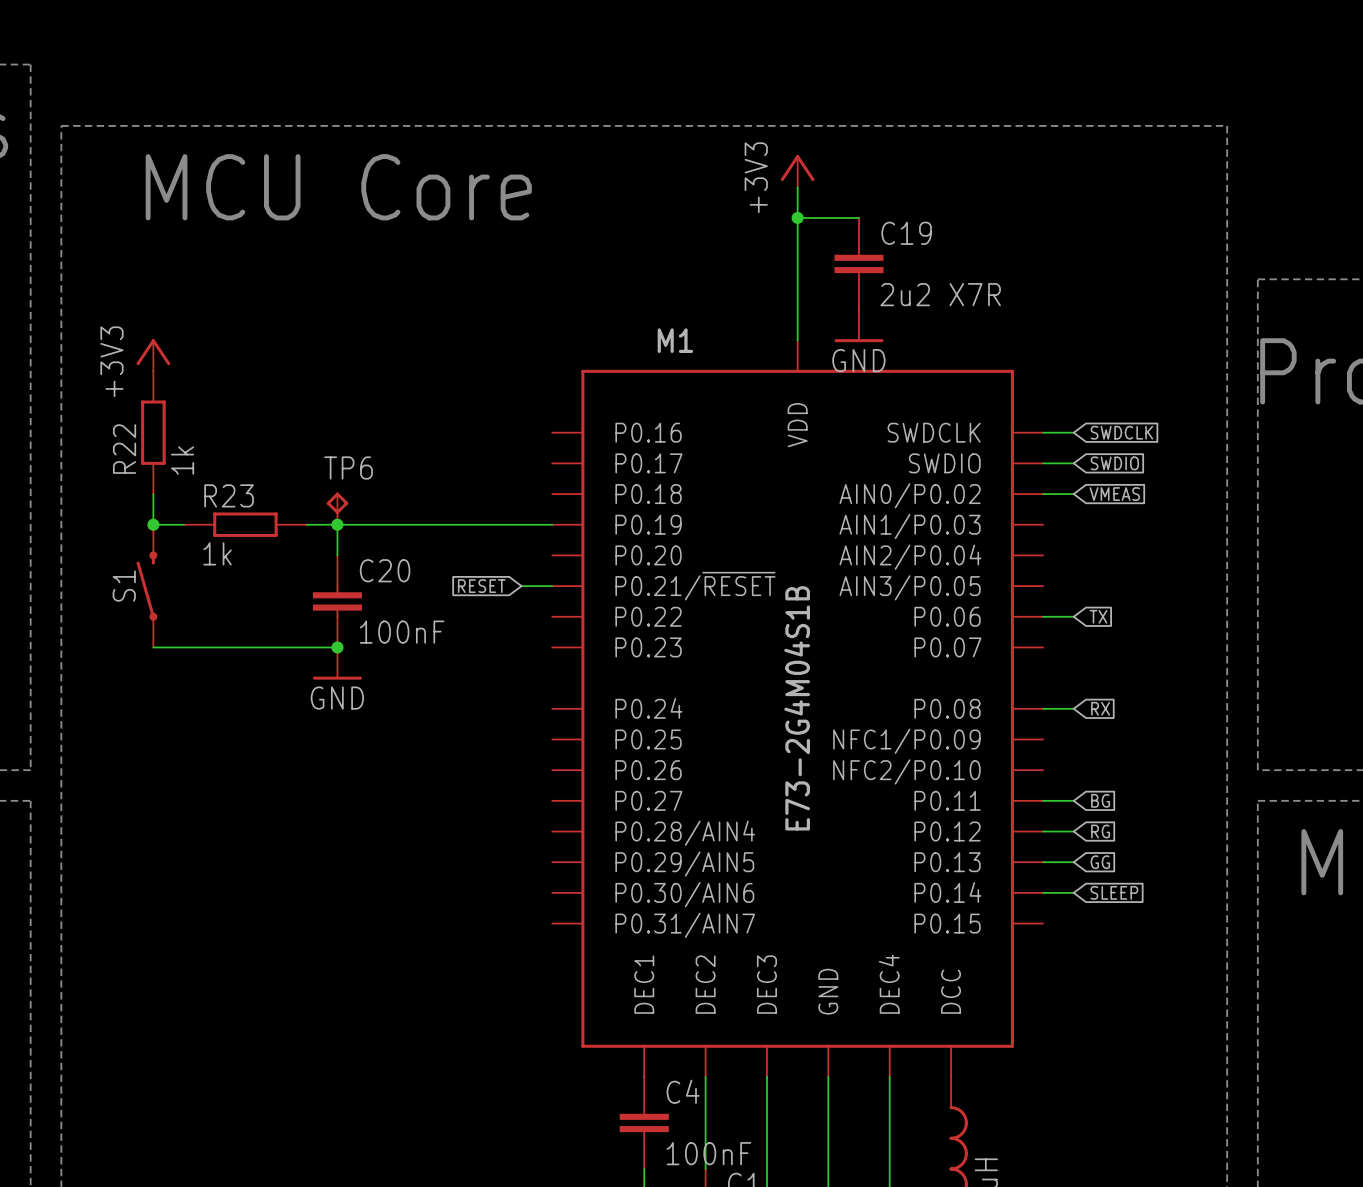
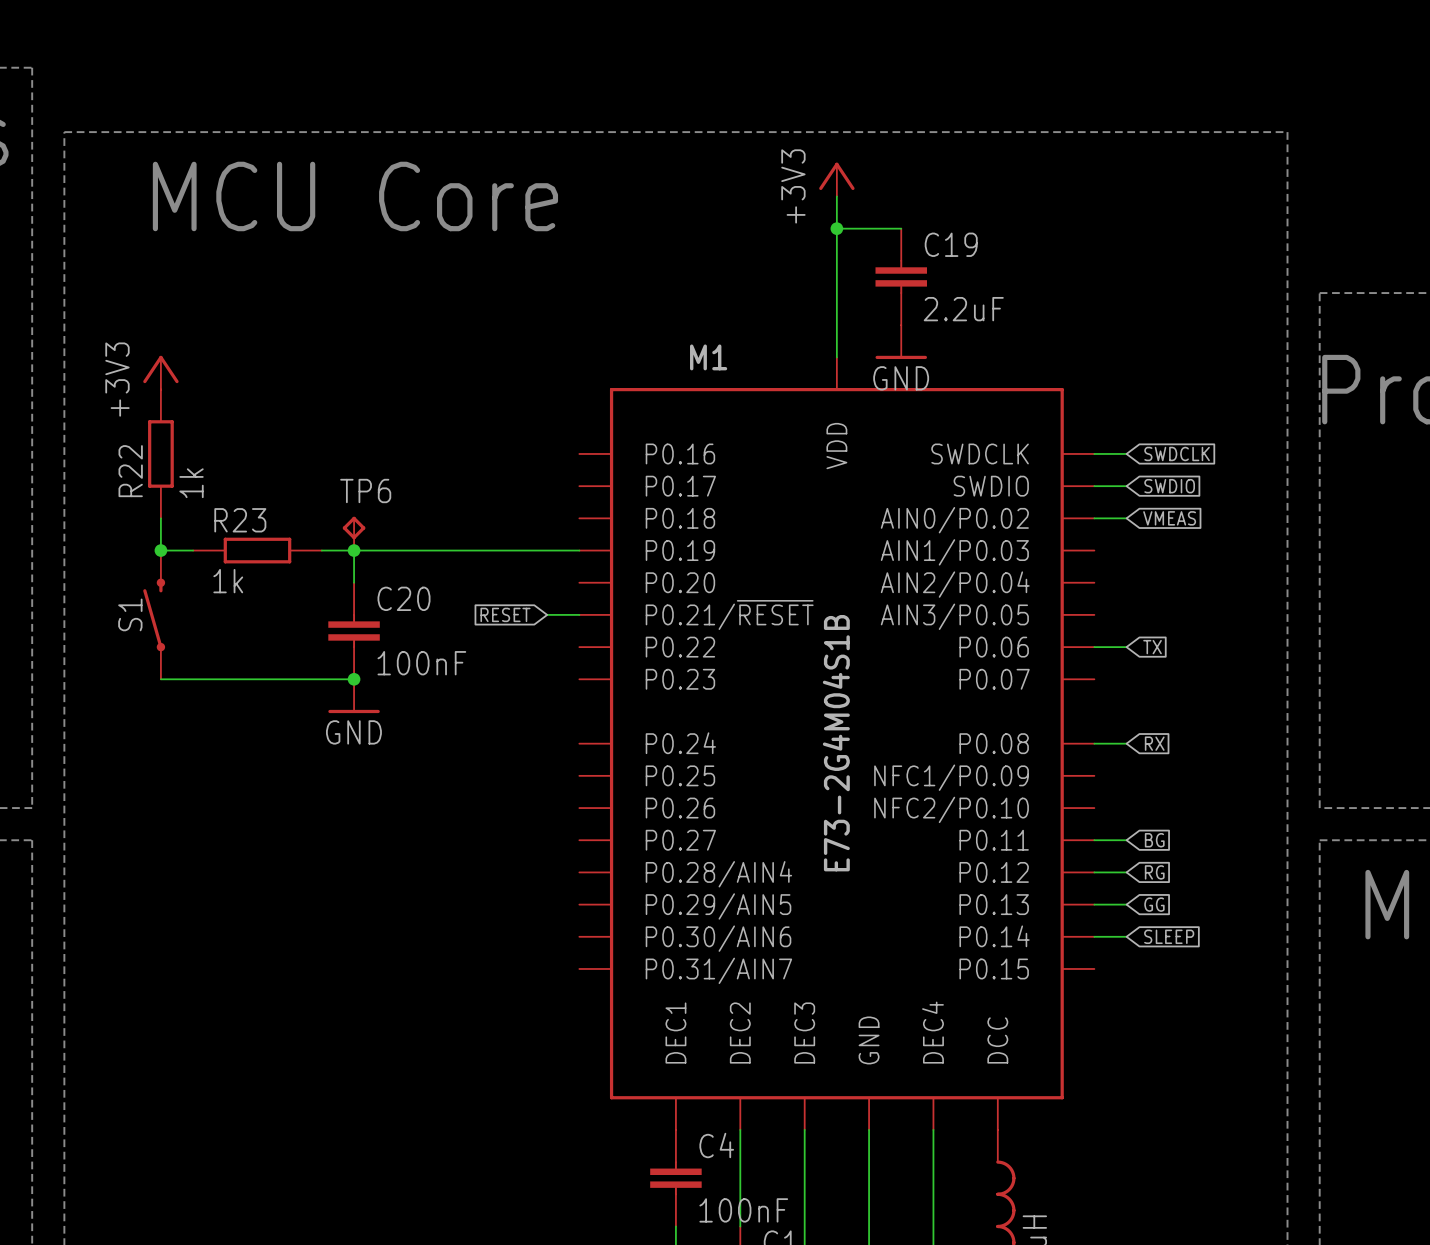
C19 value: 2u2 X7R (940, 294) -> 2.2uF (963, 309)

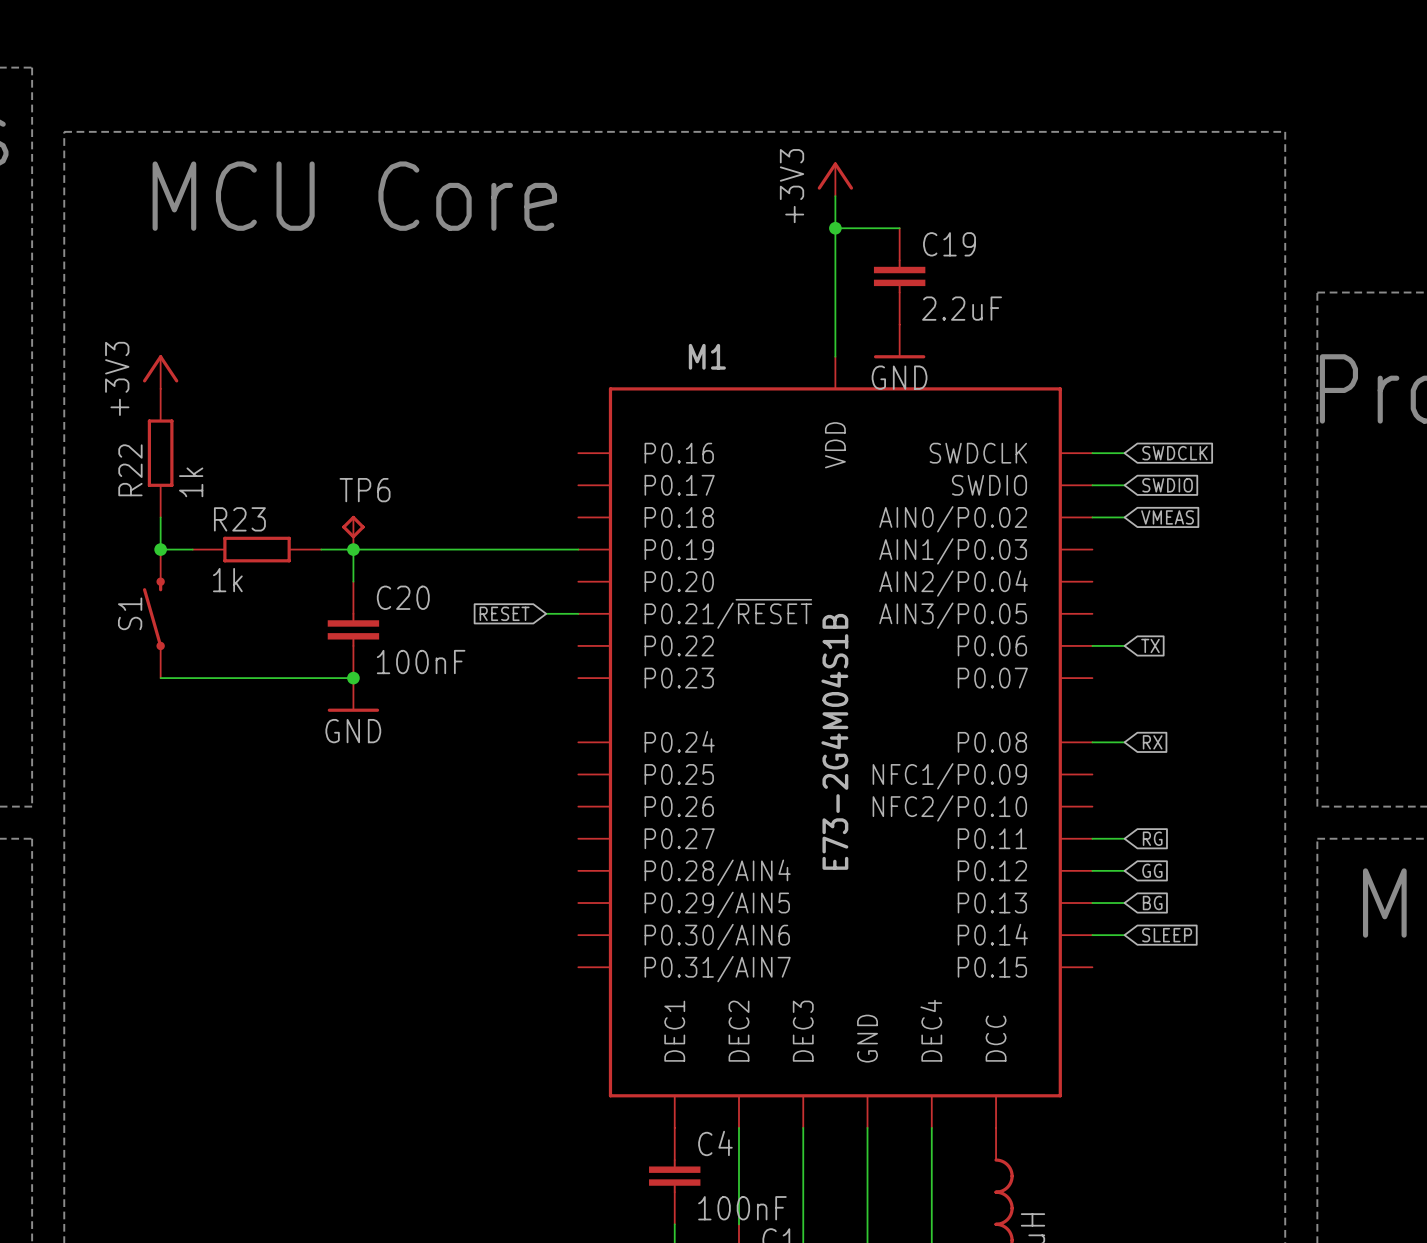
global label: BG (1154, 840) -> RG (1152, 838)
global label: RG (1154, 872) -> GG (1152, 870)
global label: GG (1154, 904) -> BG (1152, 903)

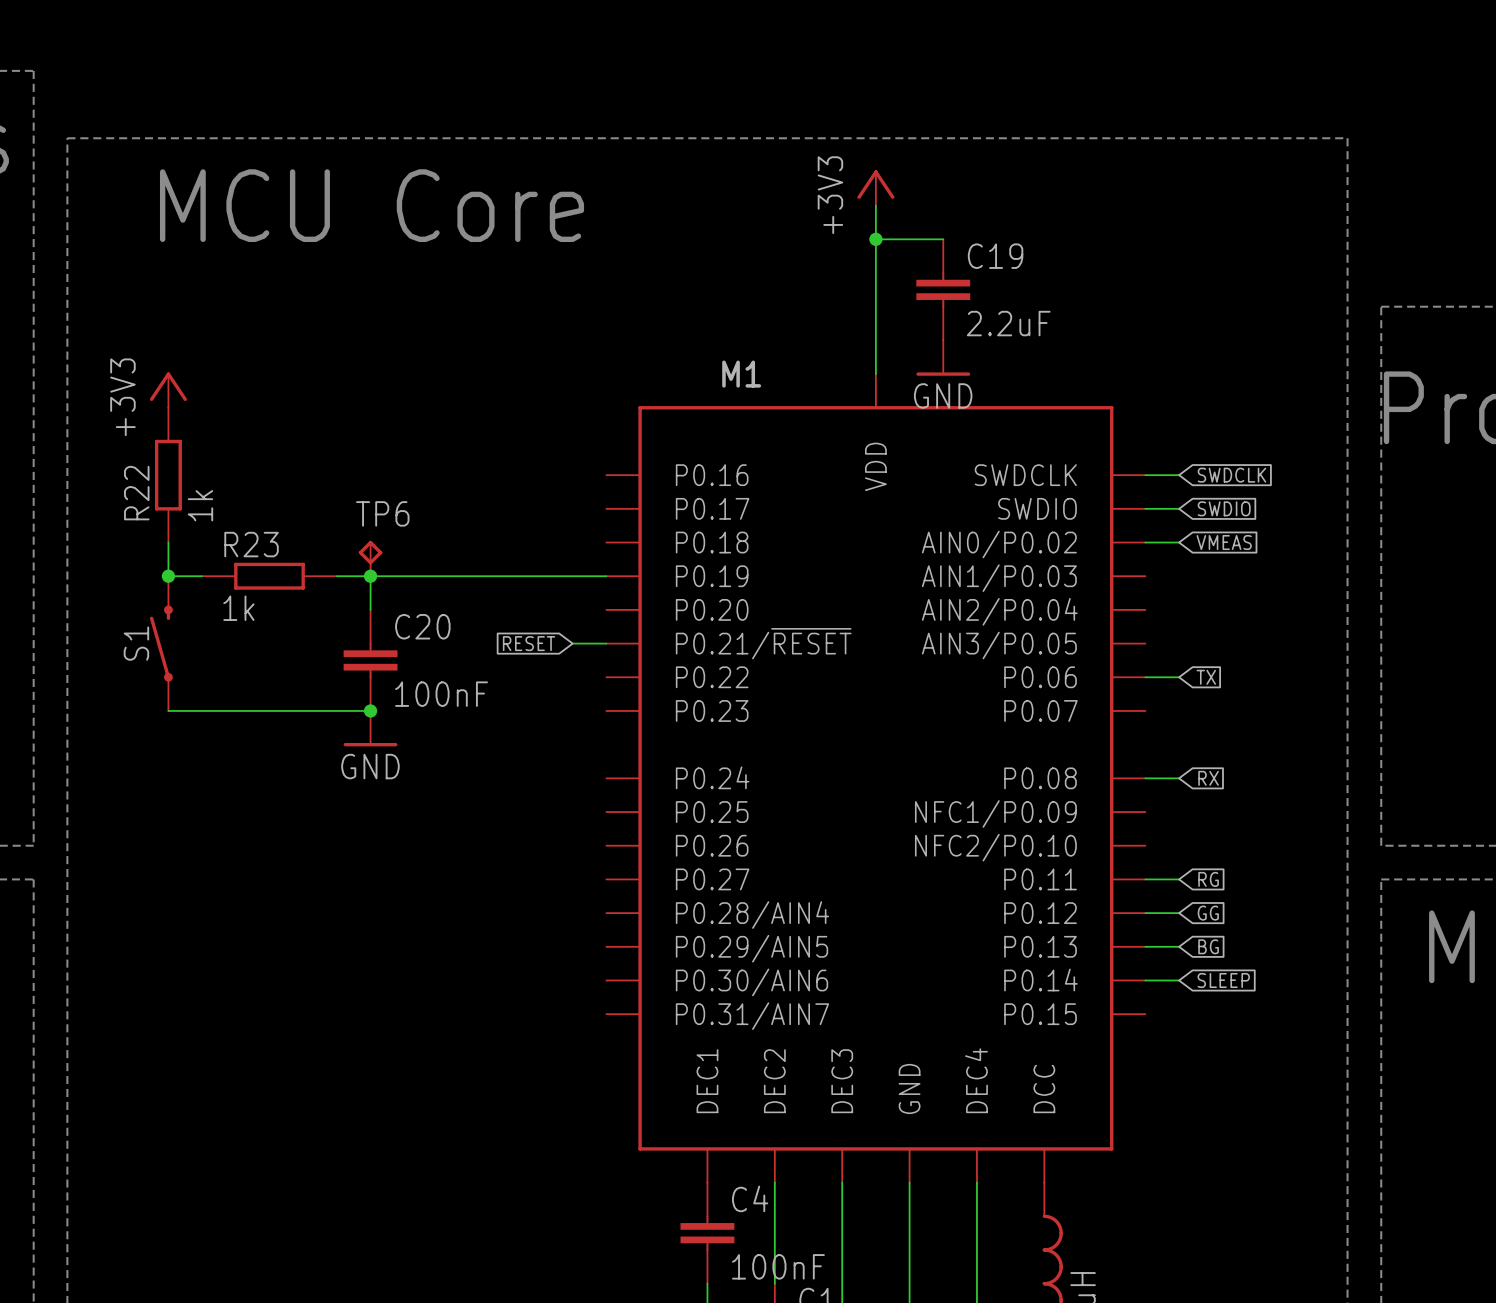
M1 value: E73-2G4M04S1B (834, 741) -> none

